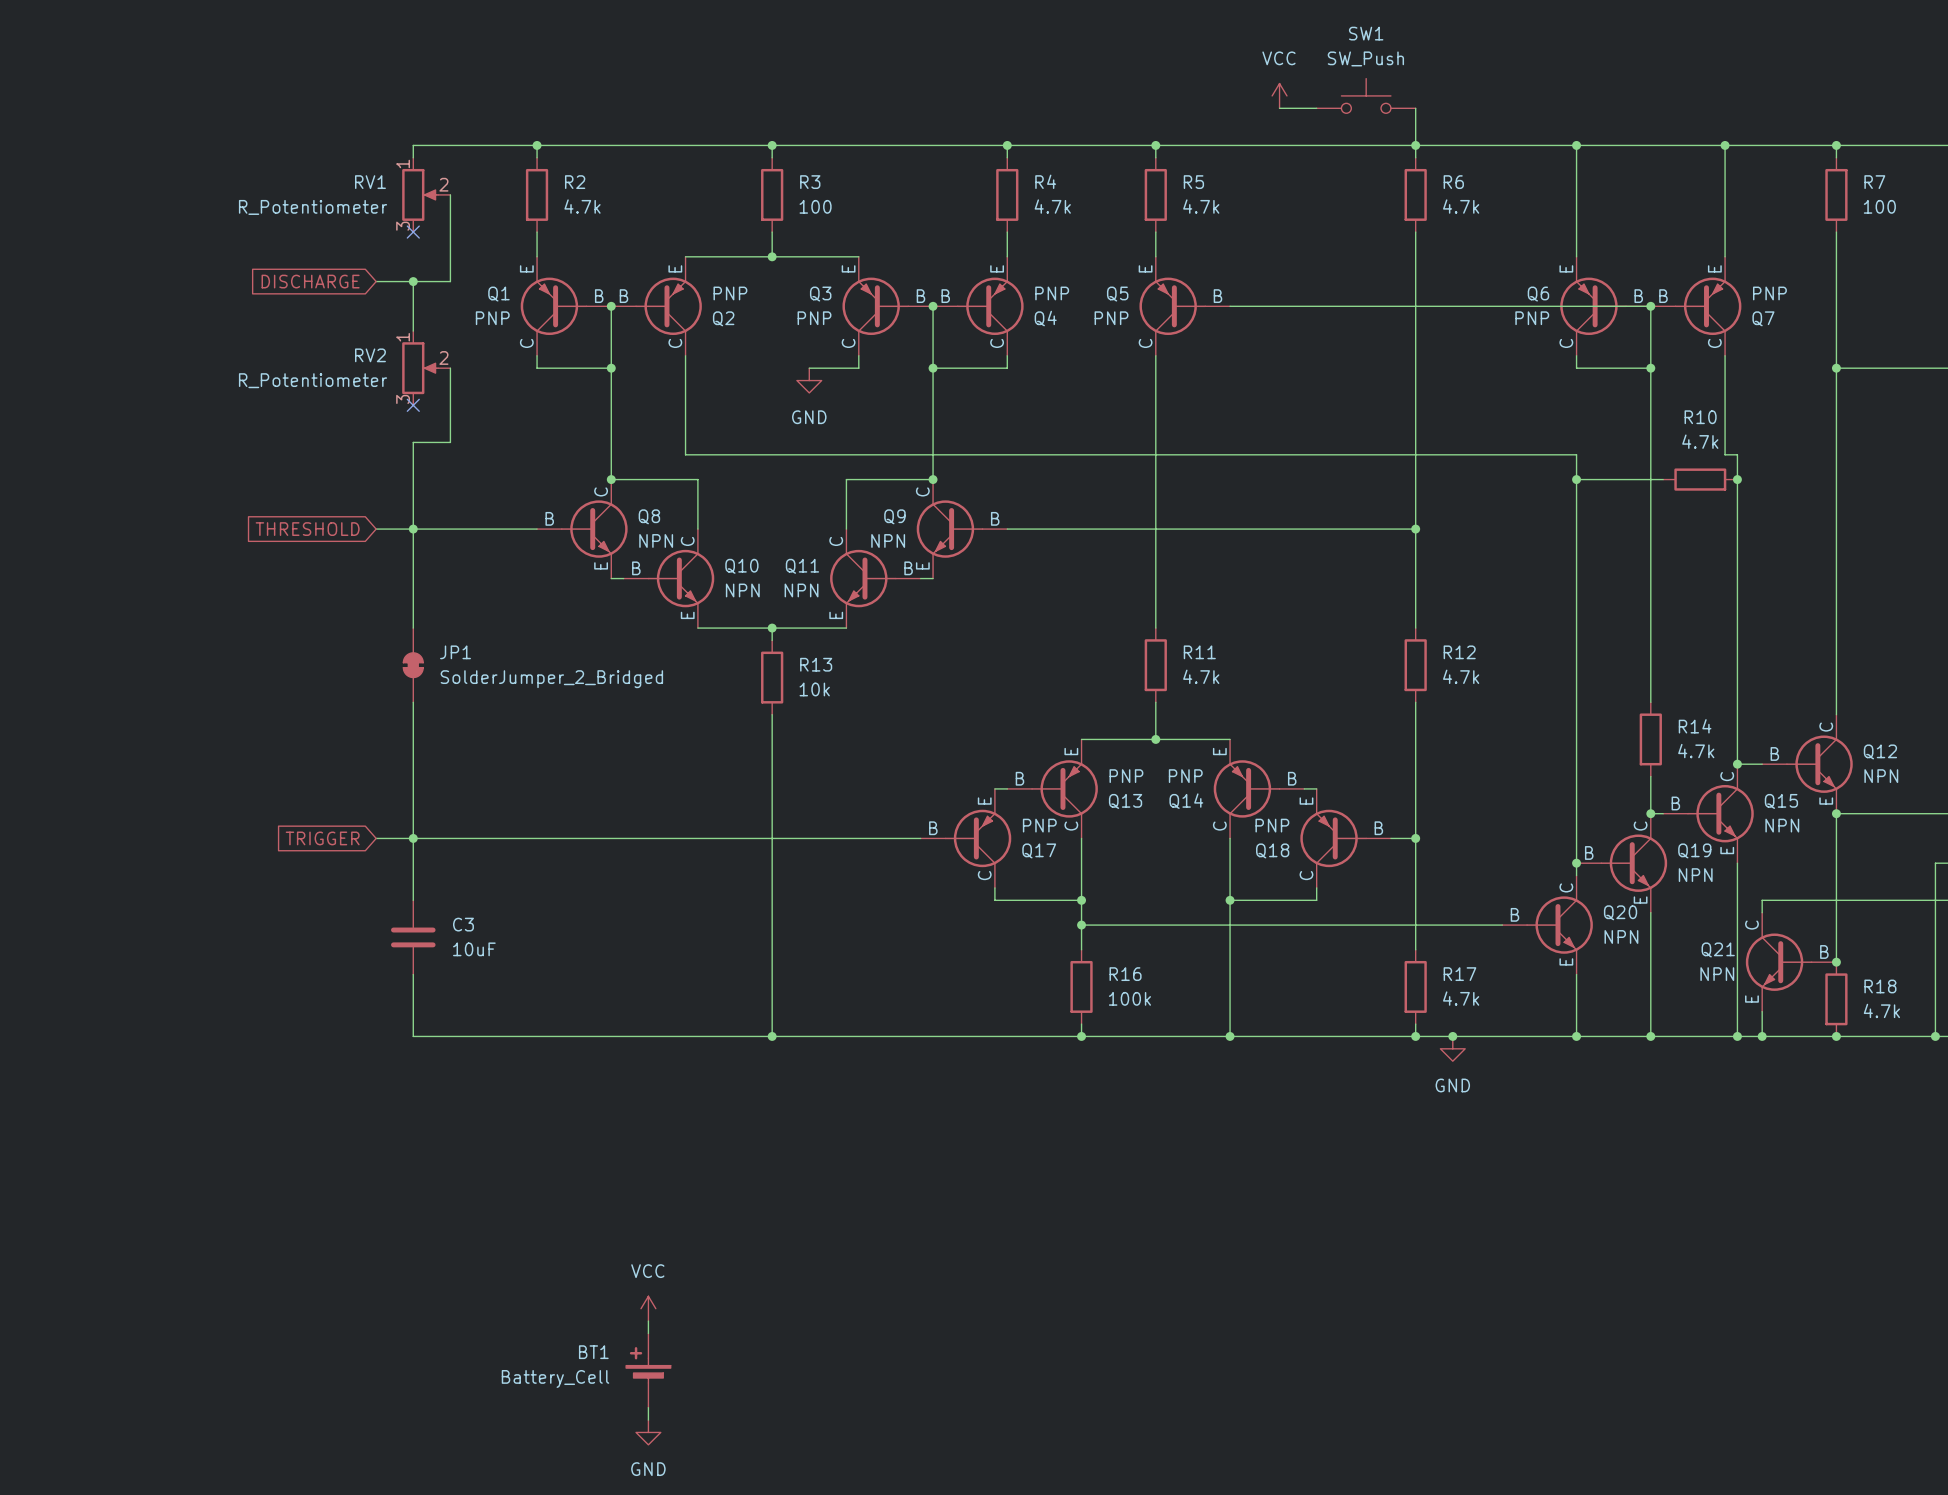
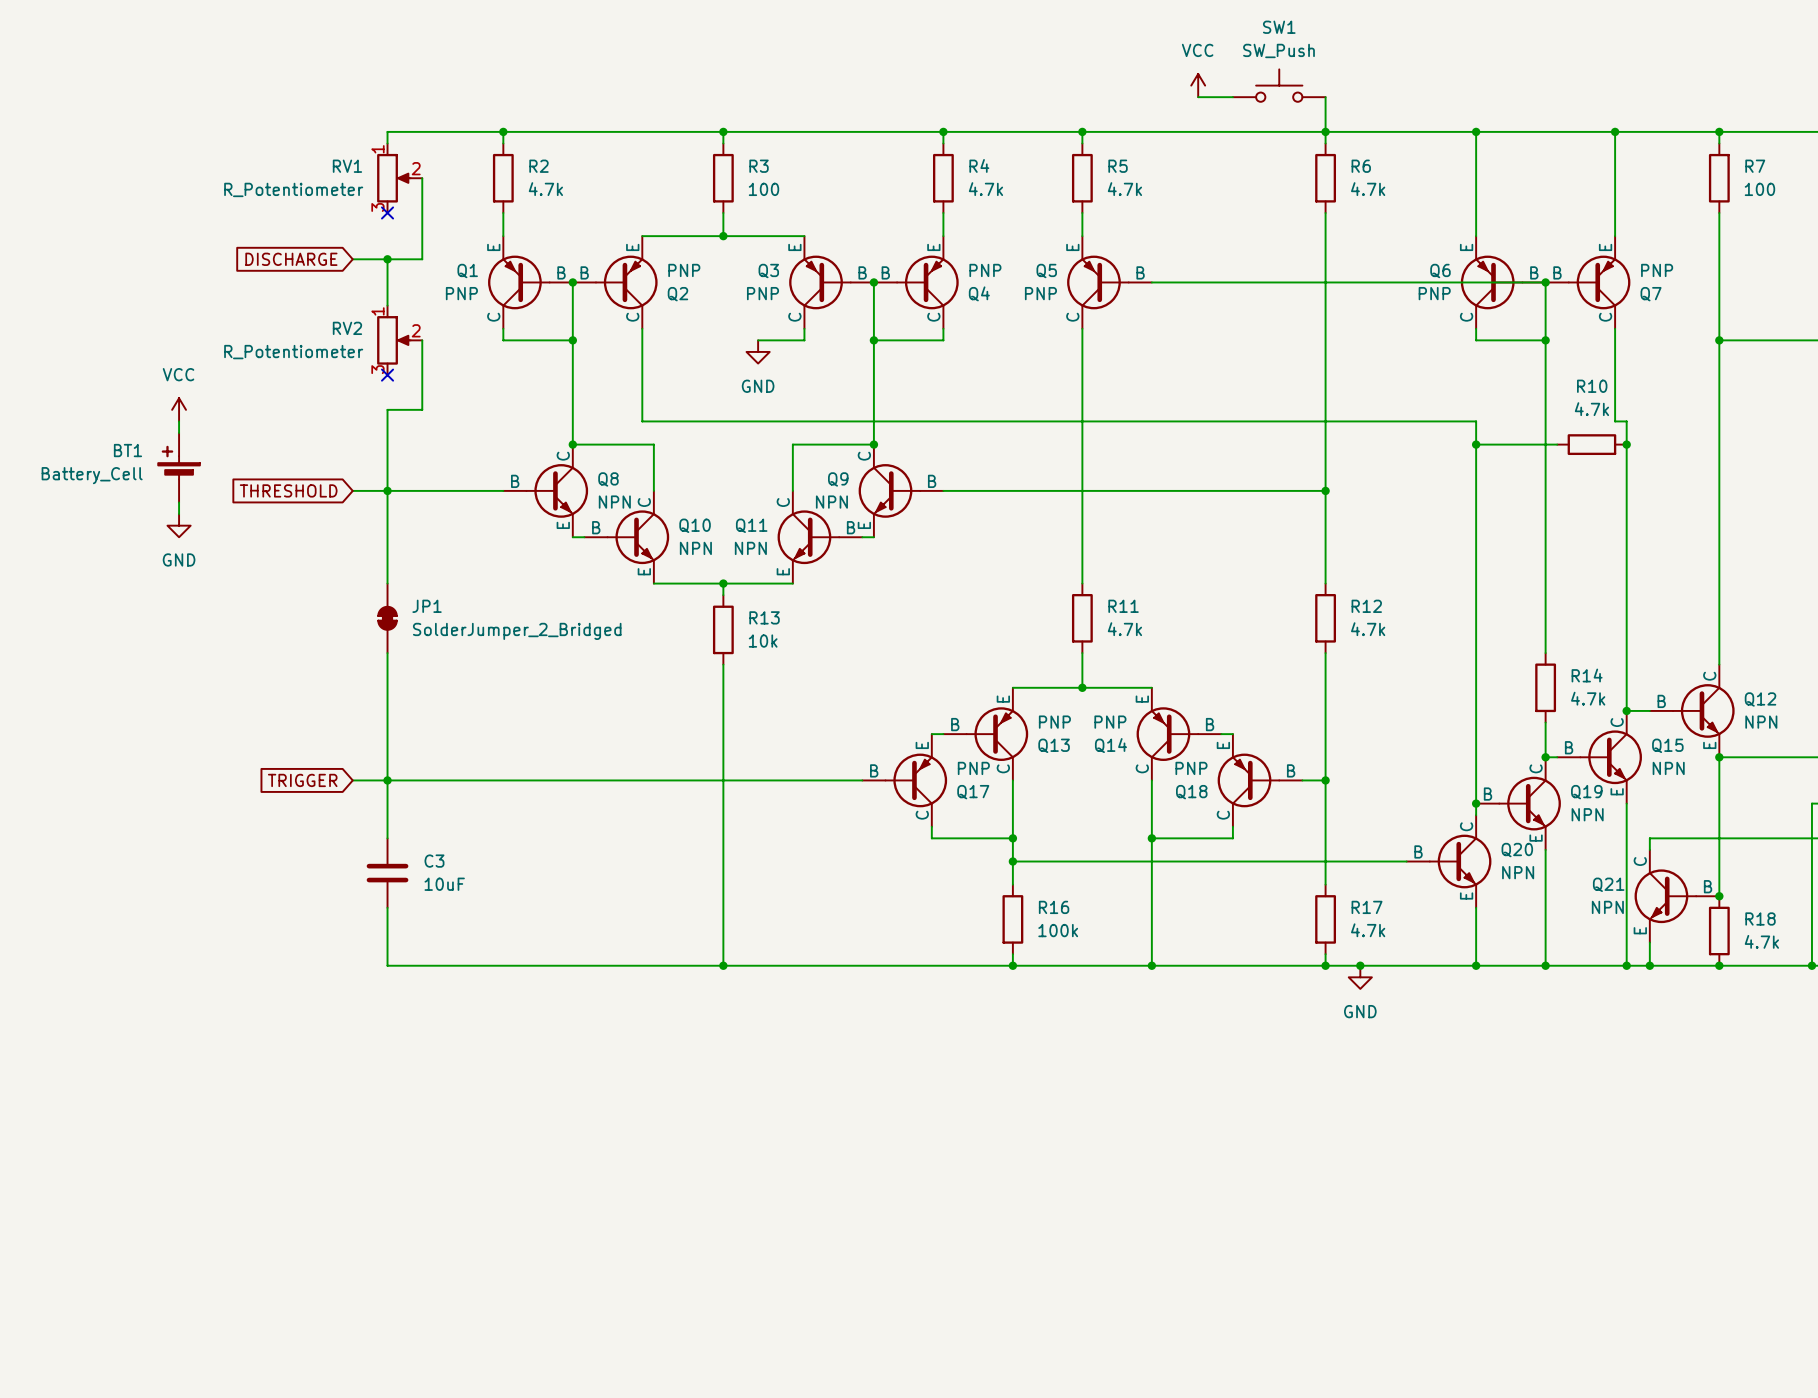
power symbol: none -> VCC (179, 409)
wire: none -> (179, 421) (179, 433)
wire: none -> (179, 502) (179, 514)
power symbol: none -> GND (179, 525)
power symbol: VCC (648, 1308) -> none
wire: (648, 1321) (648, 1333) -> none
BT1 position: (648, 1370) -> (179, 467)
wire: (648, 1407) (648, 1420) -> none
power symbol: GND (648, 1432) -> none

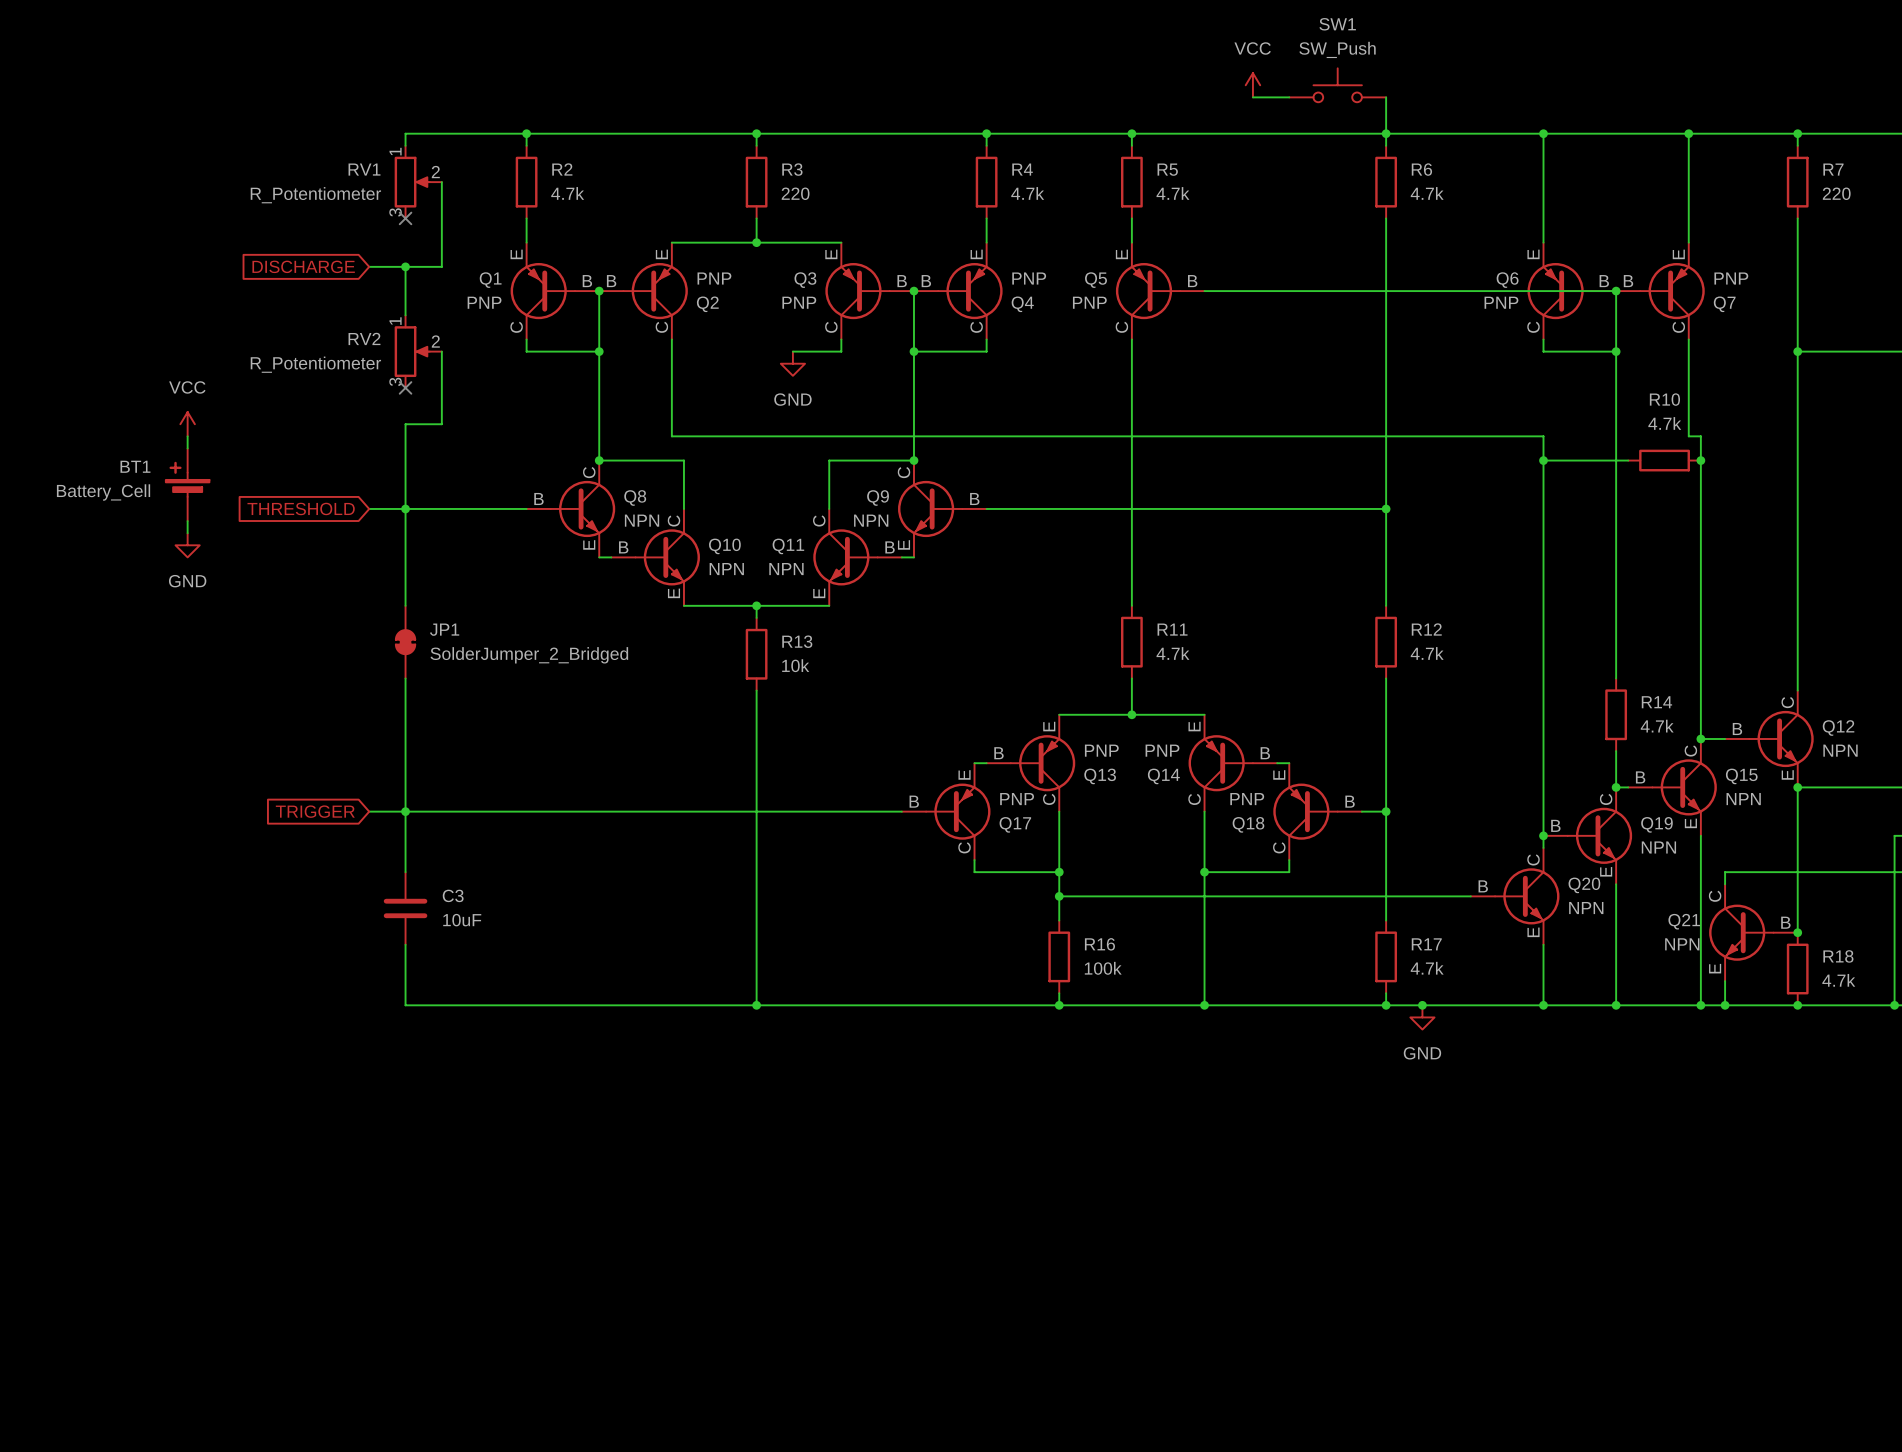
R3 value: 100 (763, 189) -> 220 (795, 193)
R7 value: 100 (1759, 189) -> 220 (1836, 193)

